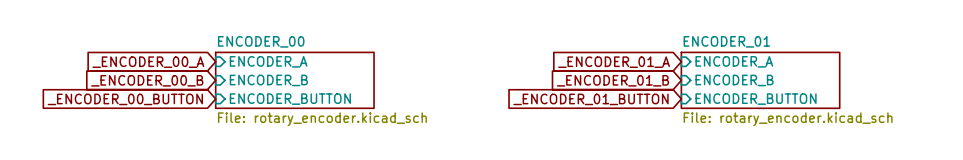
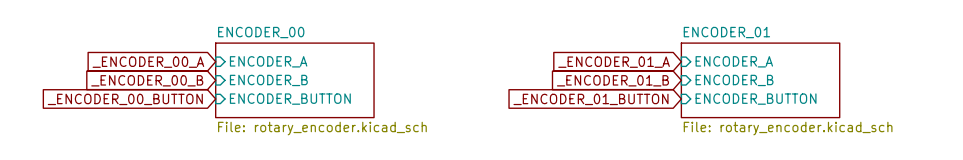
sheet ENCODER_00 shape: [215, 51, 375, 109] -> [215, 42, 375, 119]
sheet ENCODER_01 shape: [680, 51, 841, 109] -> [680, 42, 841, 119]

